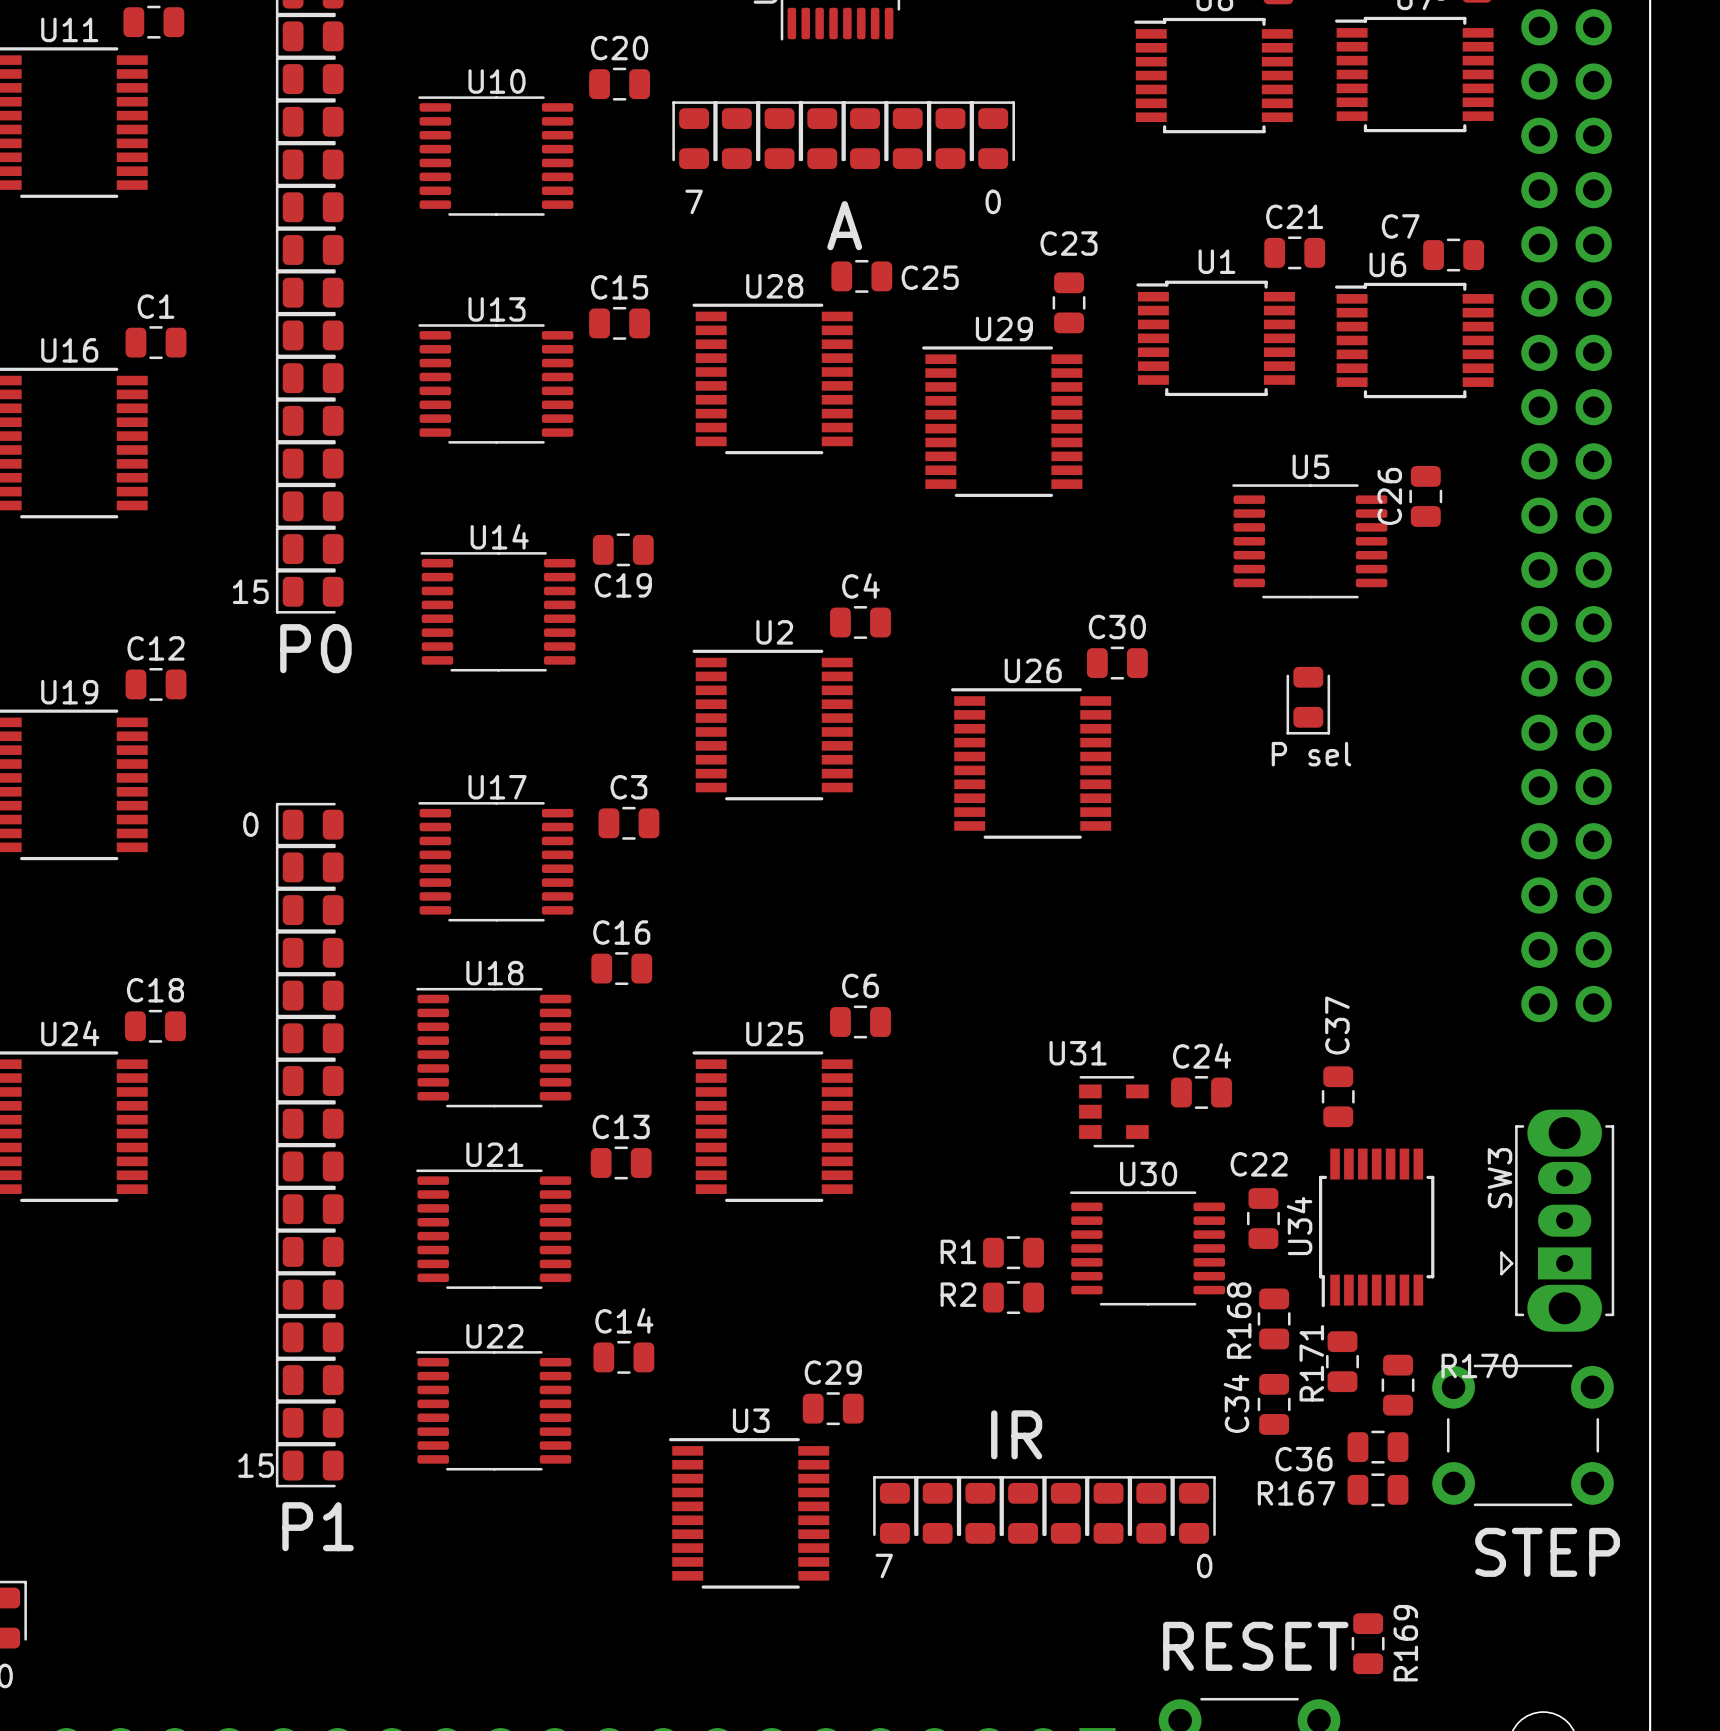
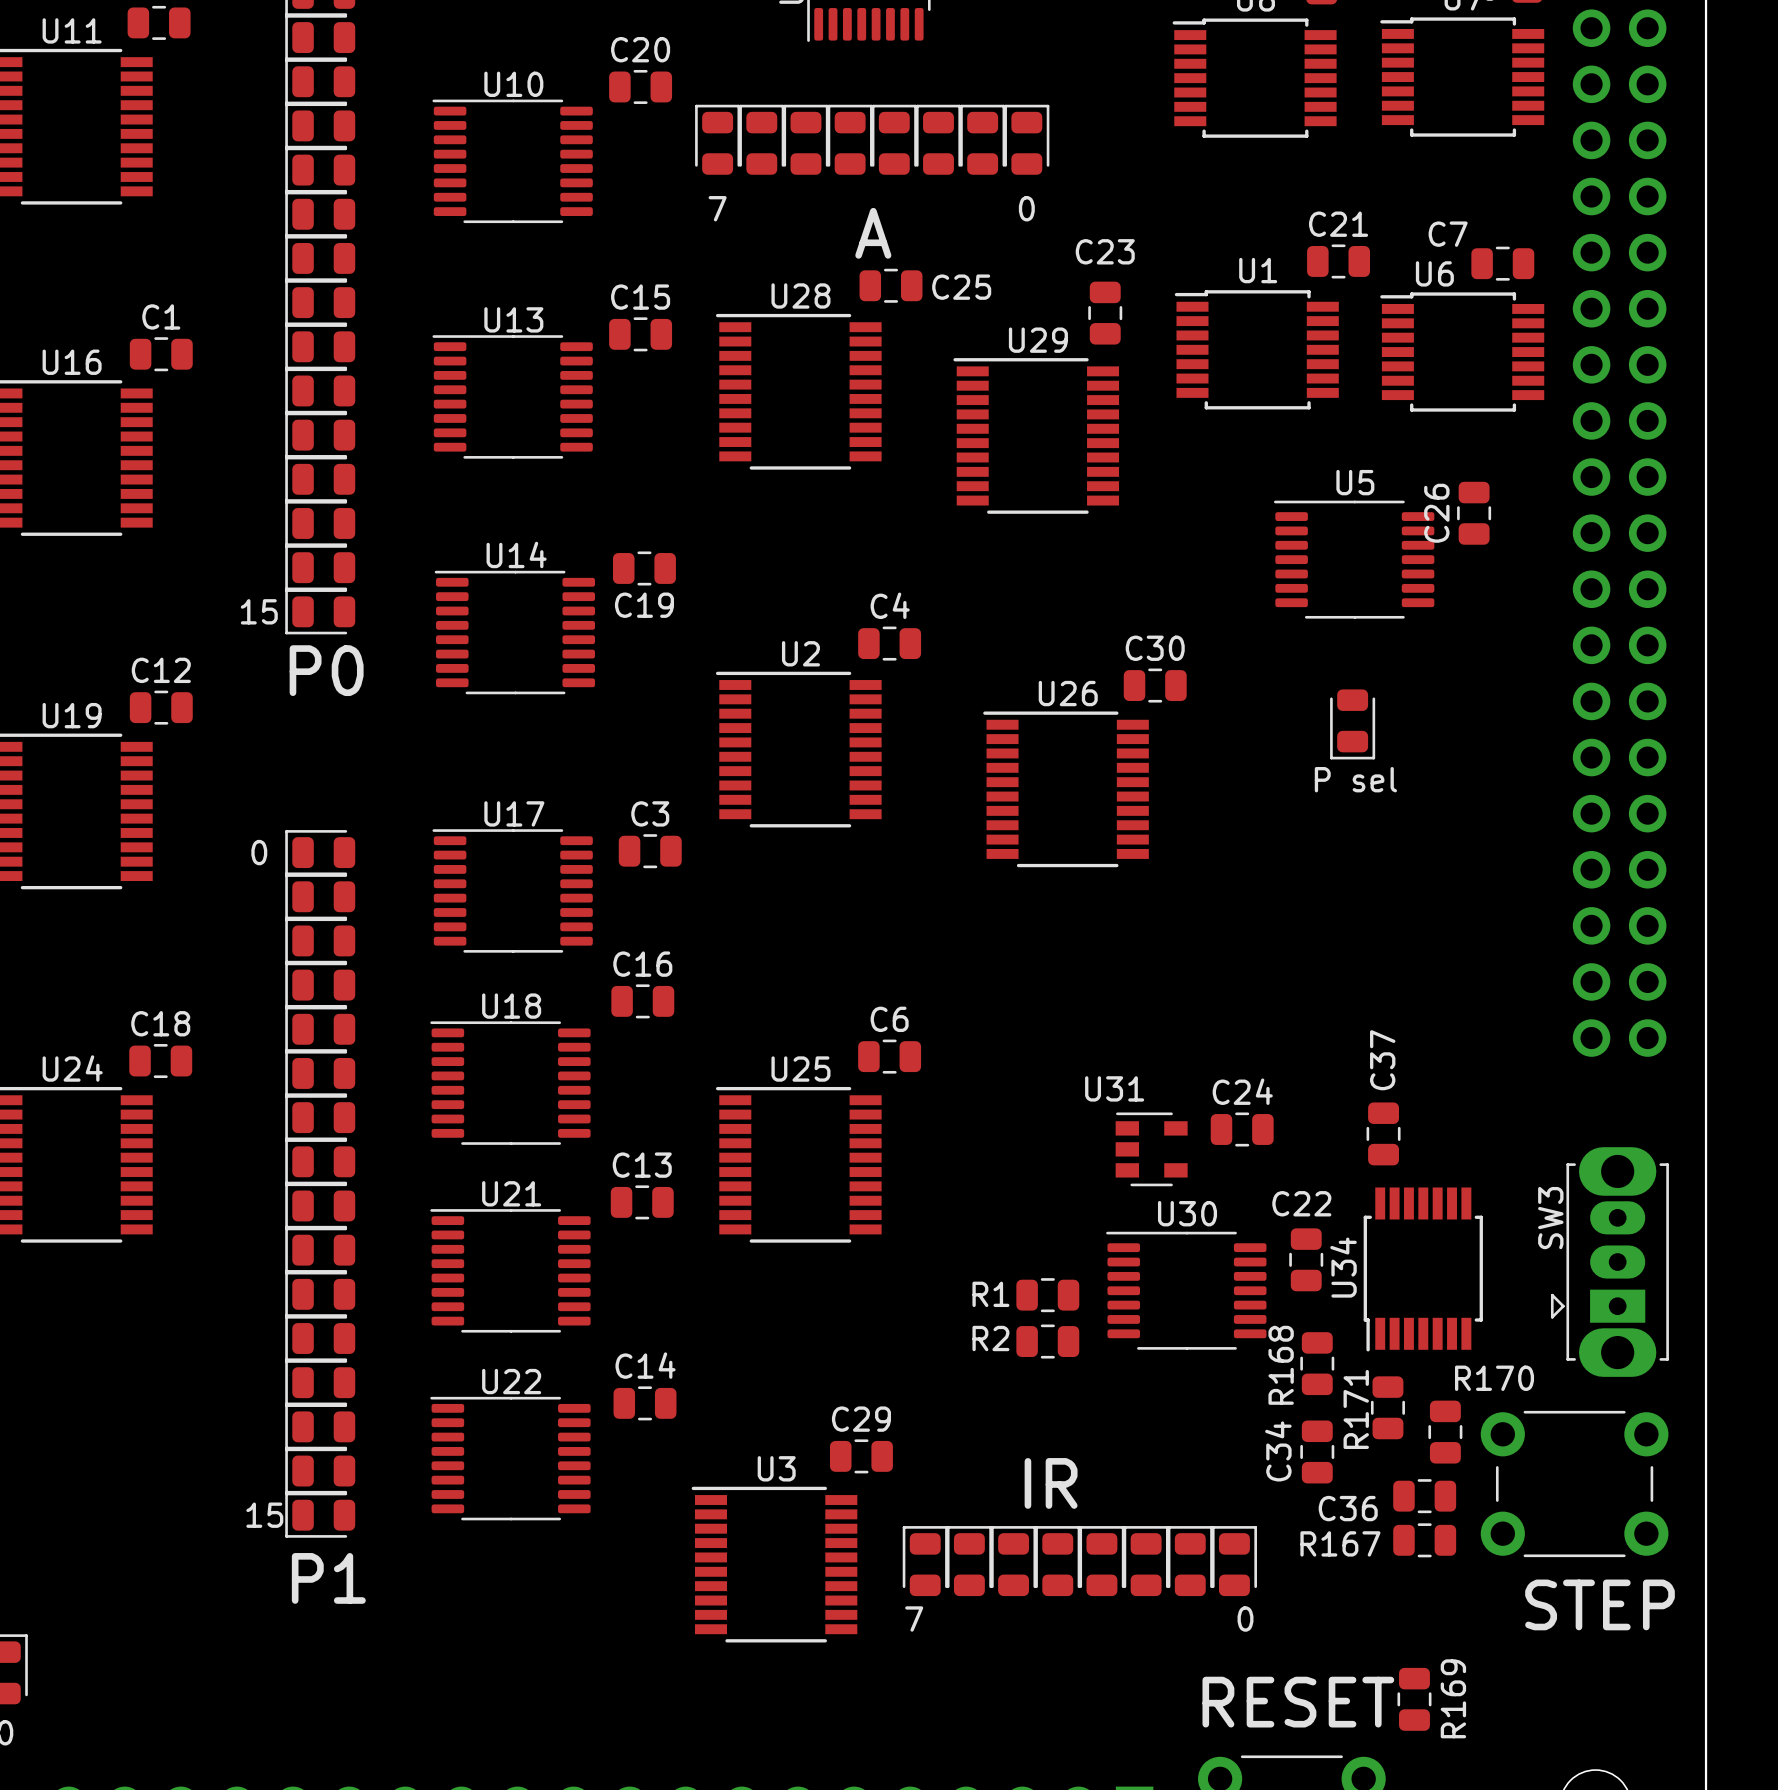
R170 name position: R170 (1479, 1365) -> R170 (1494, 1378)

